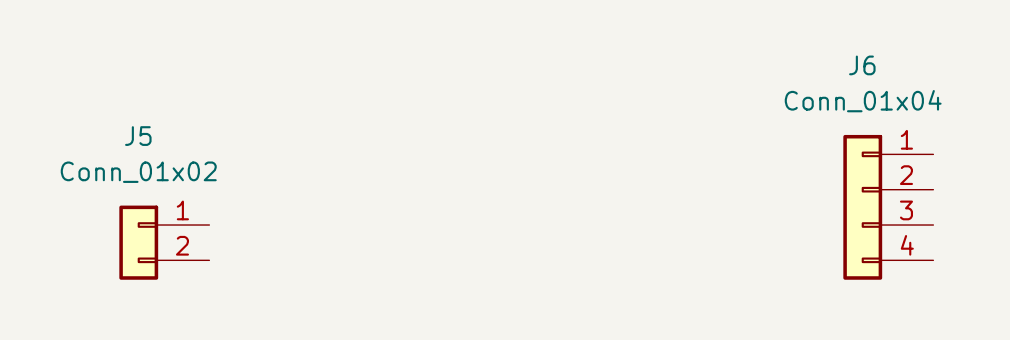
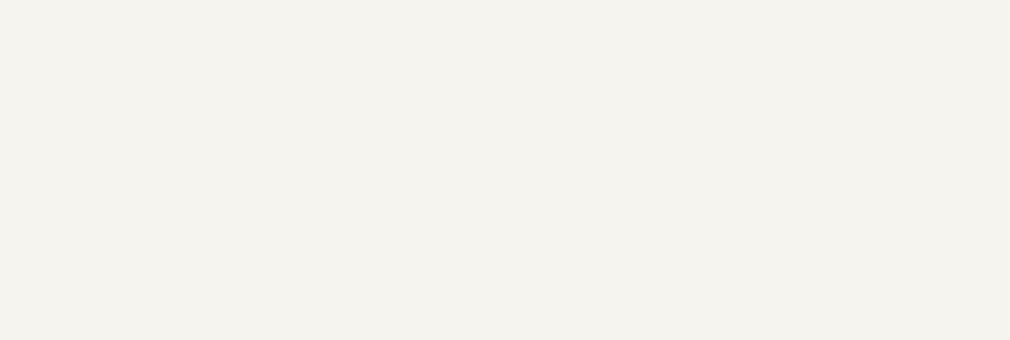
J6: Conn_01x04 (888, 207) -> none
J5: Conn_01x02 (164, 242) -> none

